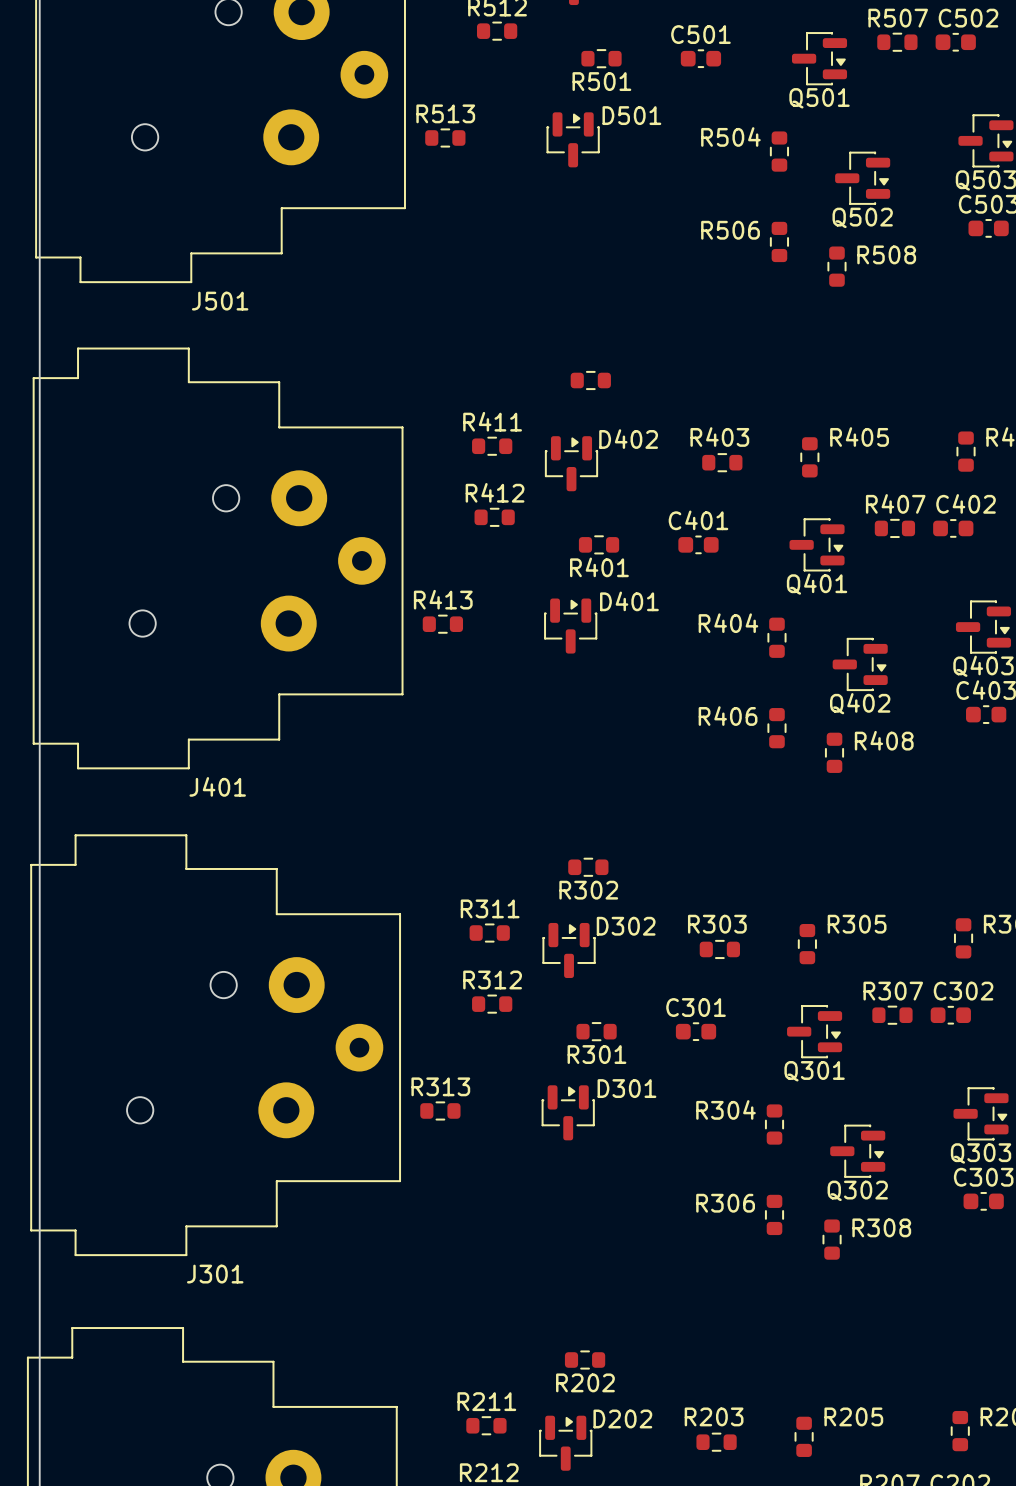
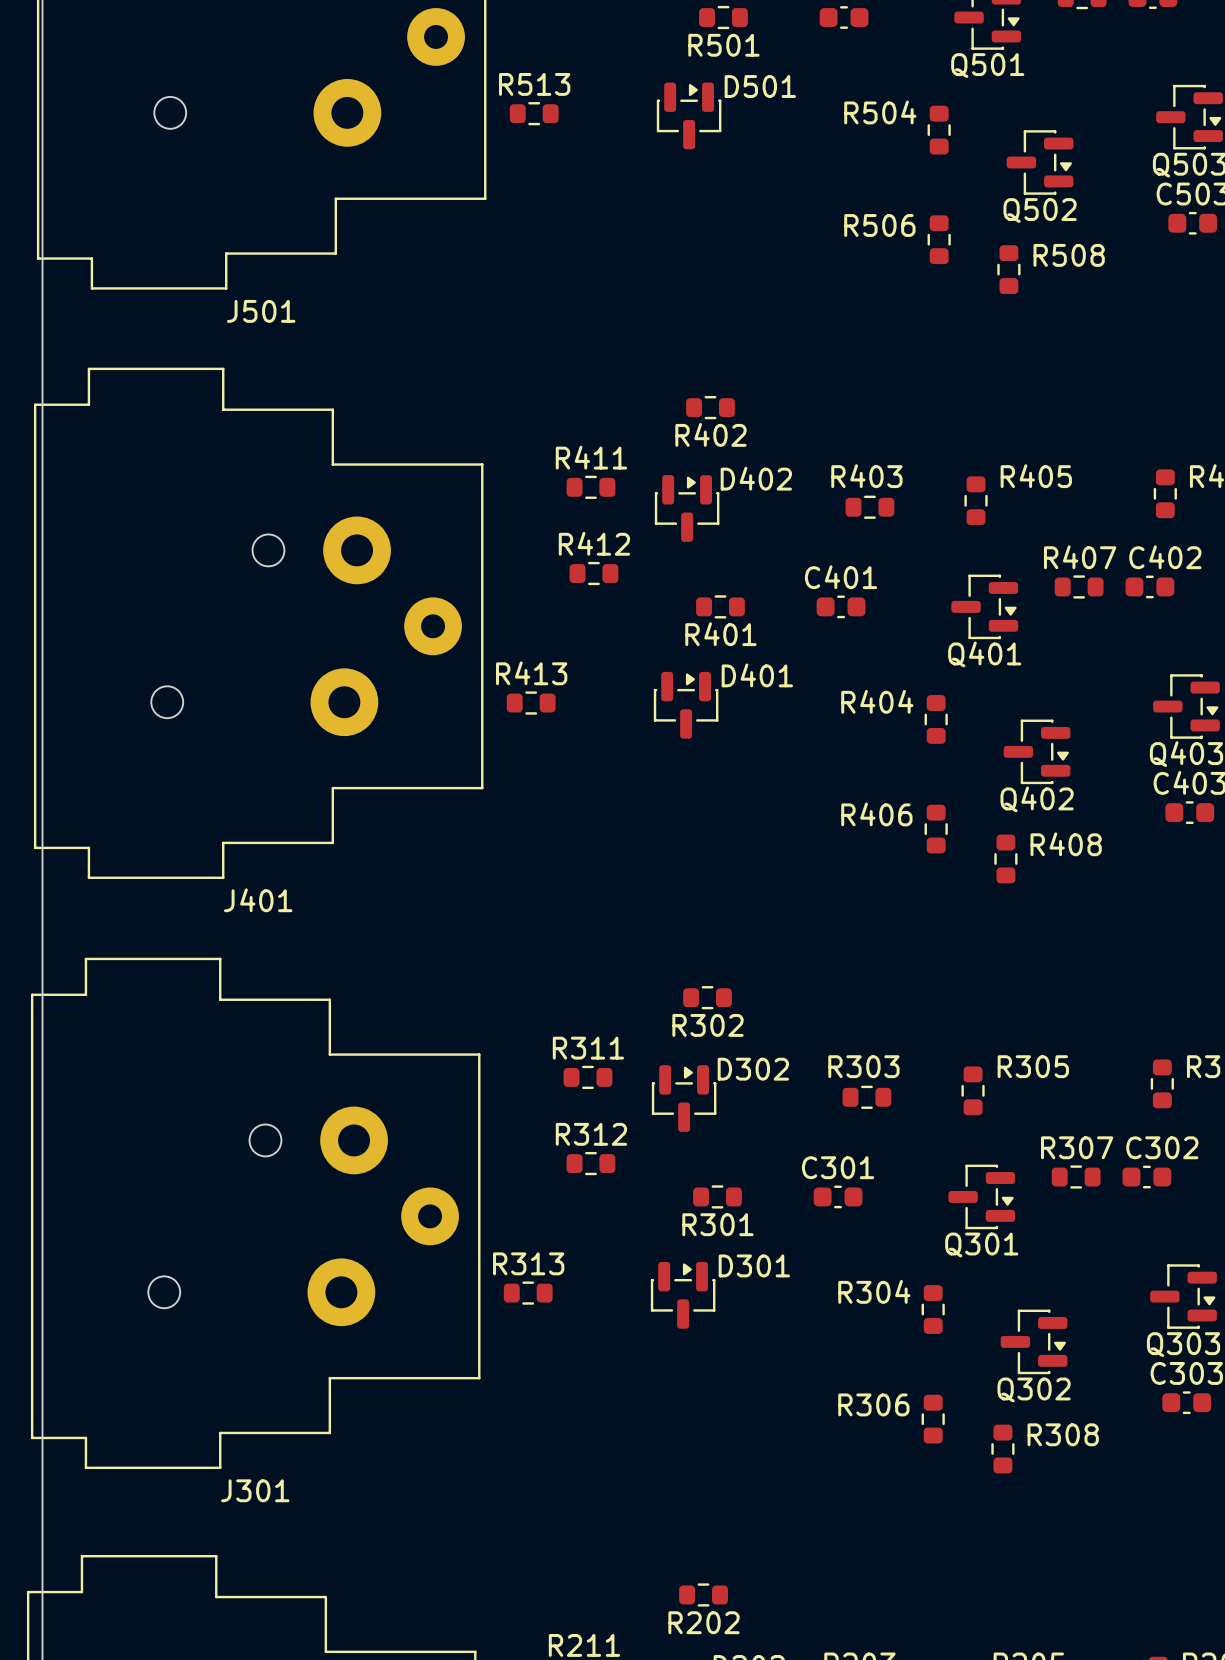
R402 name: none -> R402 (710, 434)

